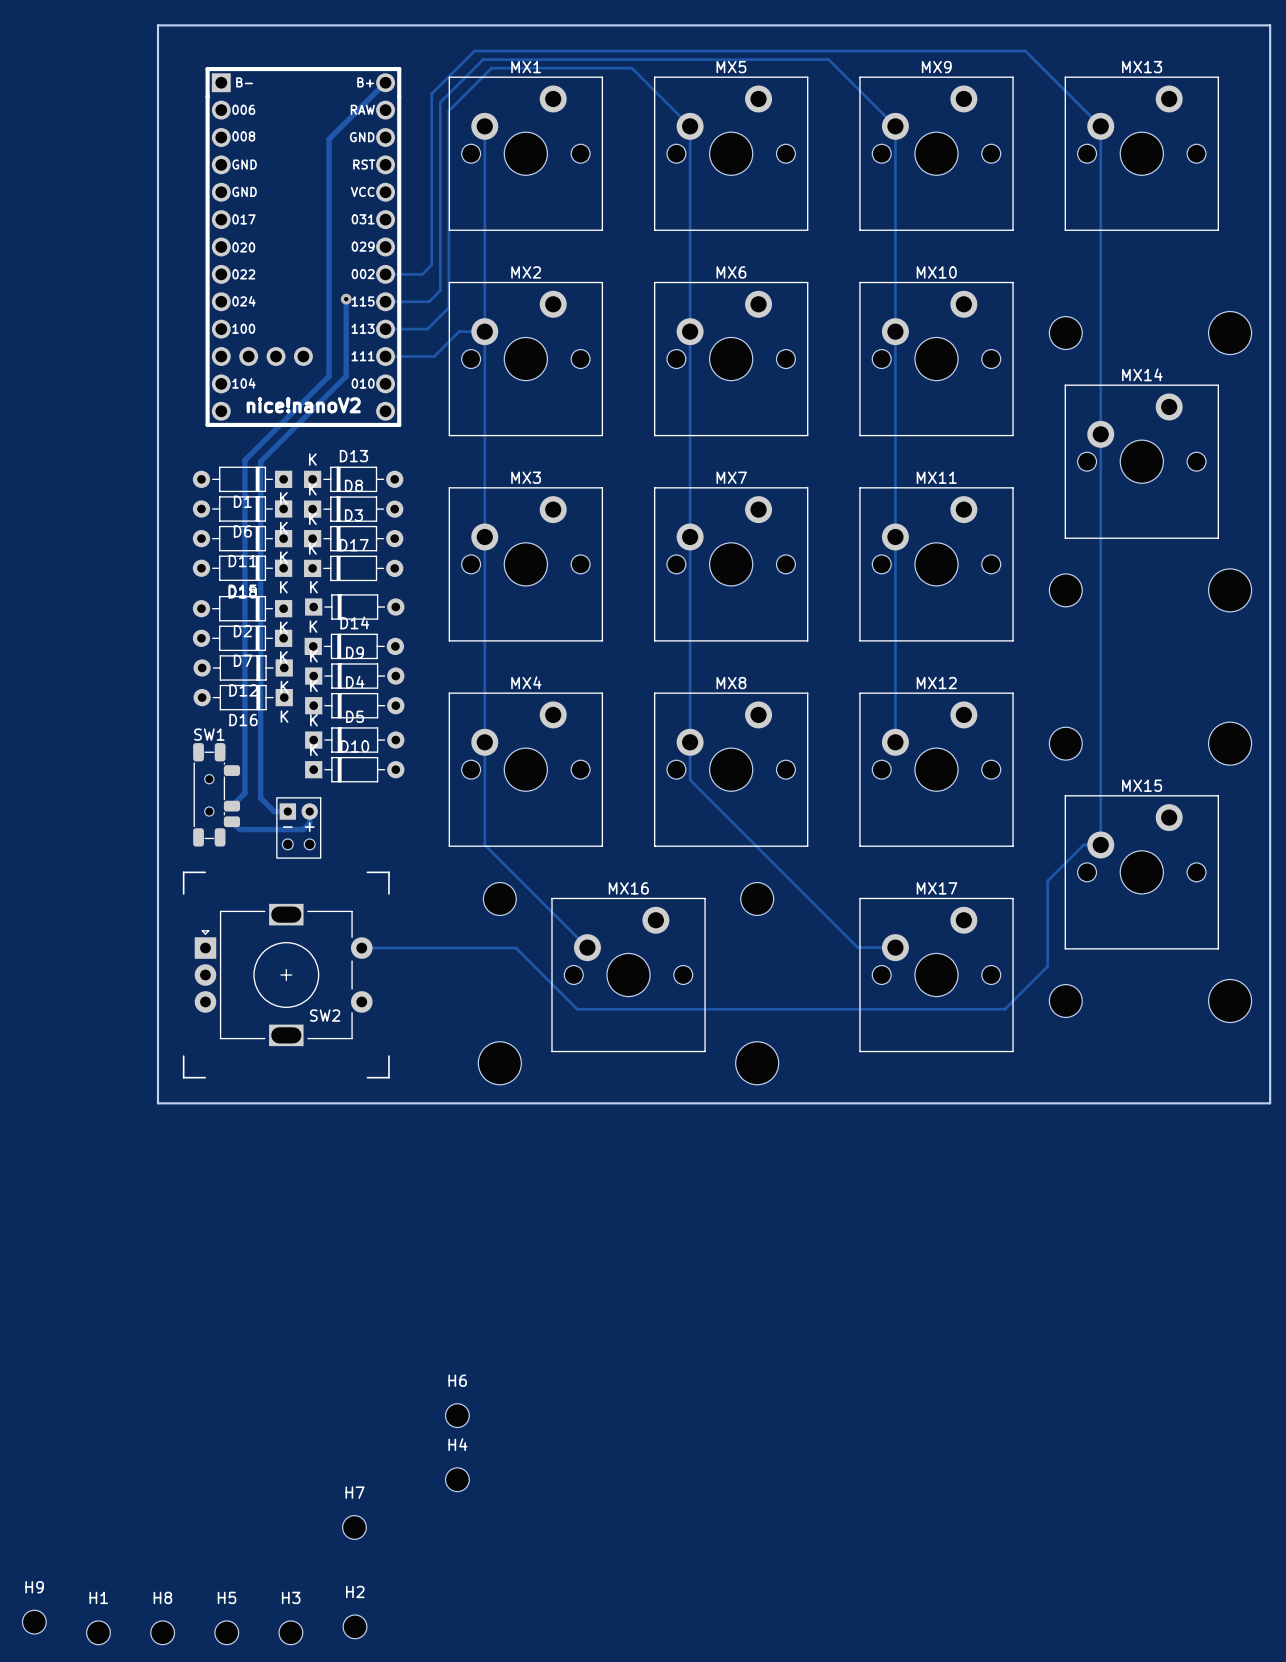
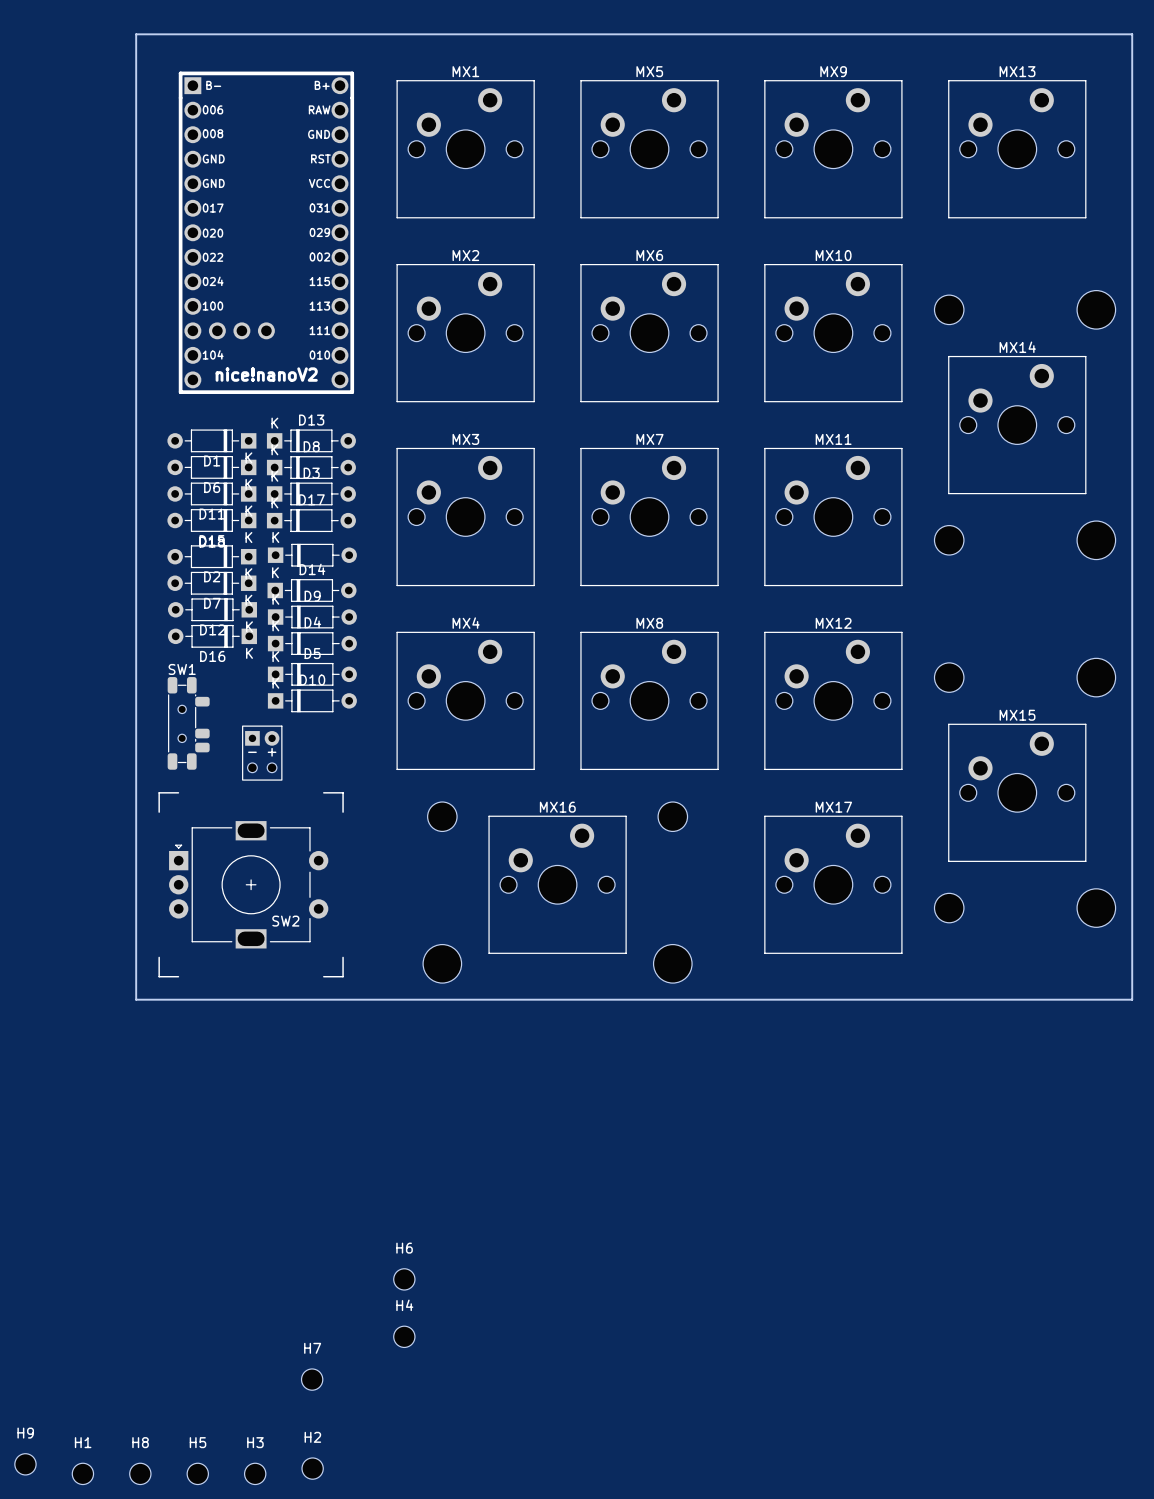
track: (385, 82) (329, 139) (329, 376) (244, 460) (244, 793) (231, 806) -> none
track: (478, 126) (484, 126) (484, 844) (587, 947) -> none
track: (385, 274) (422, 274) (431, 264) (431, 93) (474, 51) (1025, 51) (1100, 126) (1100, 844) (1083, 844) (1047, 880) (1047, 966) (1004, 1009) (577, 1009) (516, 948) (361, 948) -> none
track: (346, 299) (346, 376) (260, 461) (260, 797) (274, 811) (287, 811) -> none
via: (346, 299) -> none
track: (385, 301) (429, 301) (440, 290) (440, 102) (483, 59) (828, 59) (895, 126) (895, 742) -> none
track: (385, 329) (427, 329) (448, 307) (448, 110) (491, 68) (631, 68) (690, 126) (690, 779) (857, 947) (895, 947) -> none
track: (484, 331) (459, 331) (434, 356) (385, 356) -> none
track: (309, 811) (309, 823) (303, 829) (239, 829) (231, 821) -> none

